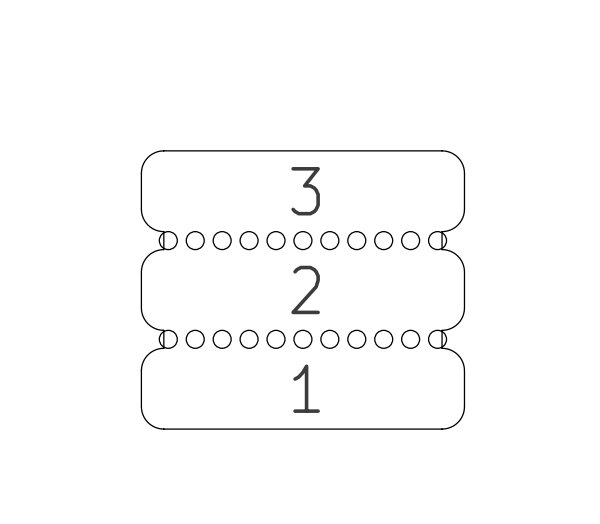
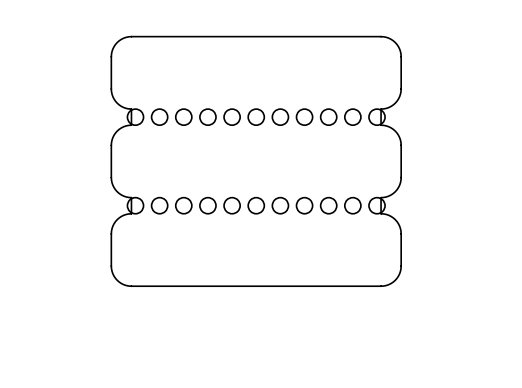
text: 3 (305, 191) -> none
text: 2 (305, 289) -> none
text: 1 (306, 388) -> none

